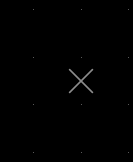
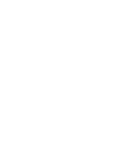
no-connect mark: (81, 81) -> none

